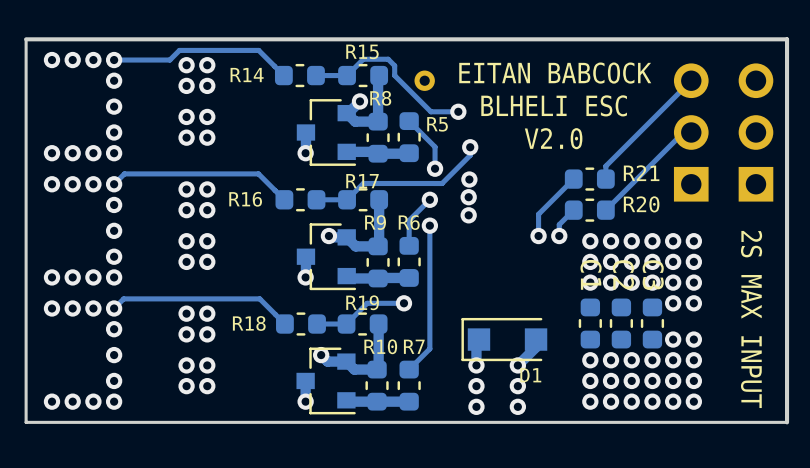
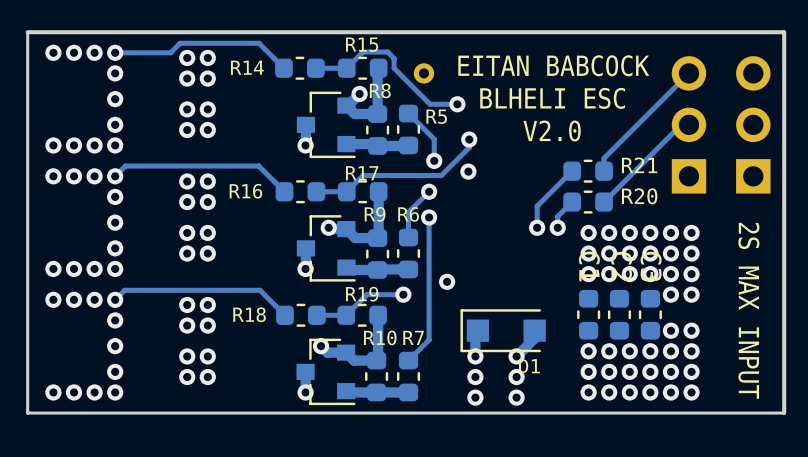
via: (468, 197) -> none
via: (468, 215) -> none
via: none -> (447, 281)

